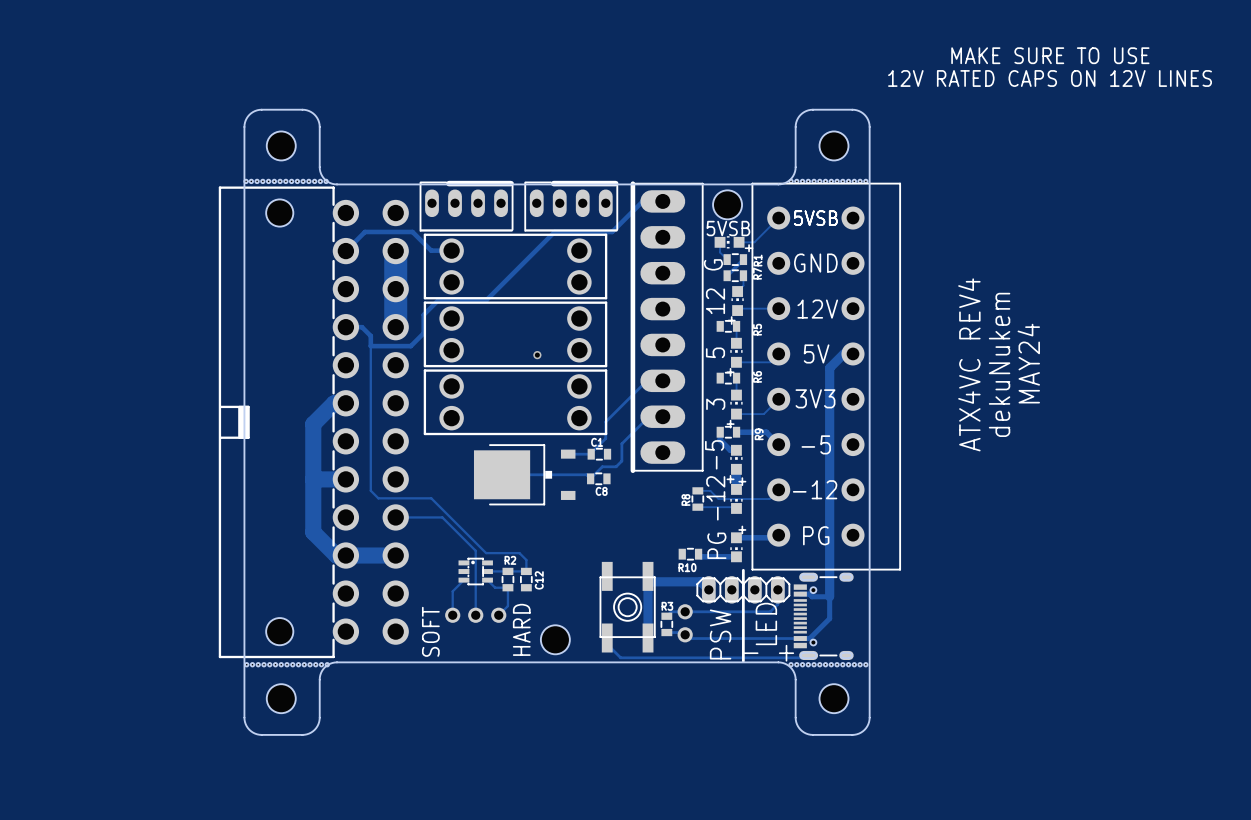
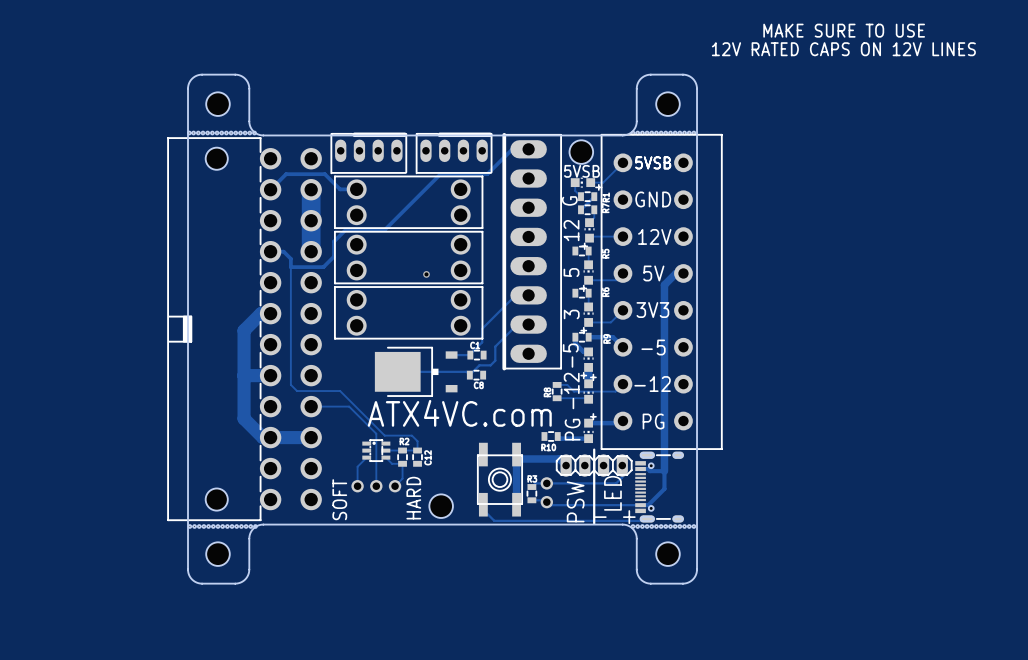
text: MAY24 (1028, 363) -> none
text: ATX4VC REV4 (969, 364) -> none
text: dekuNukem (999, 364) -> none
text: none -> ATX4VC.com (459, 413)

